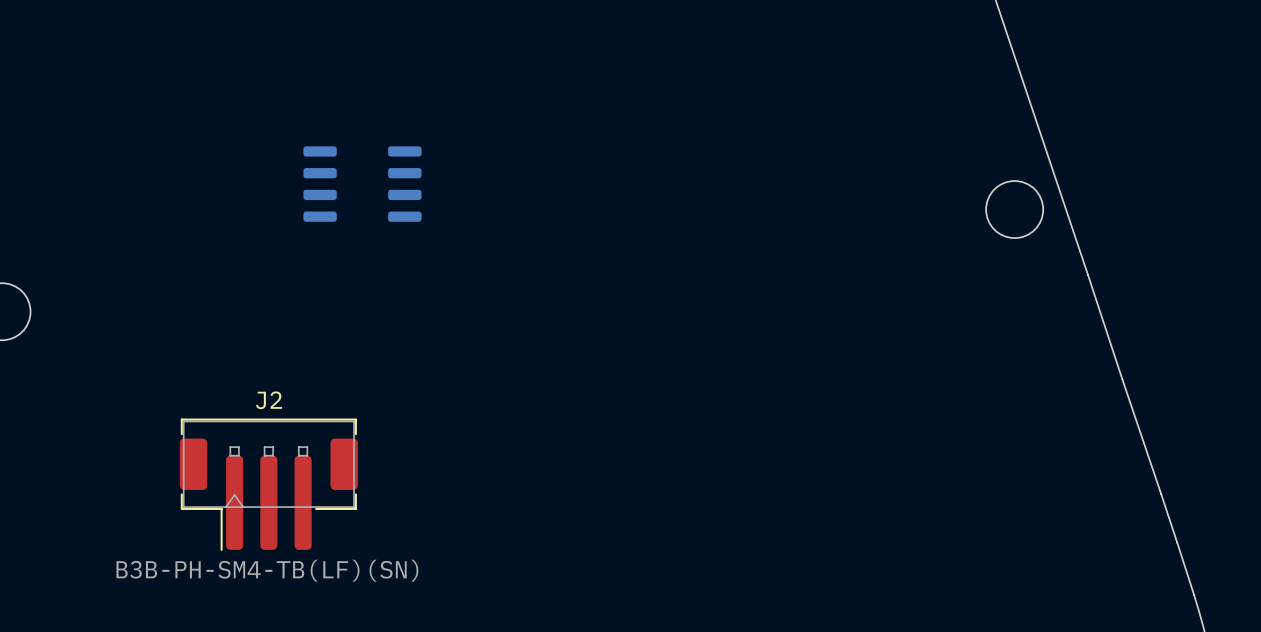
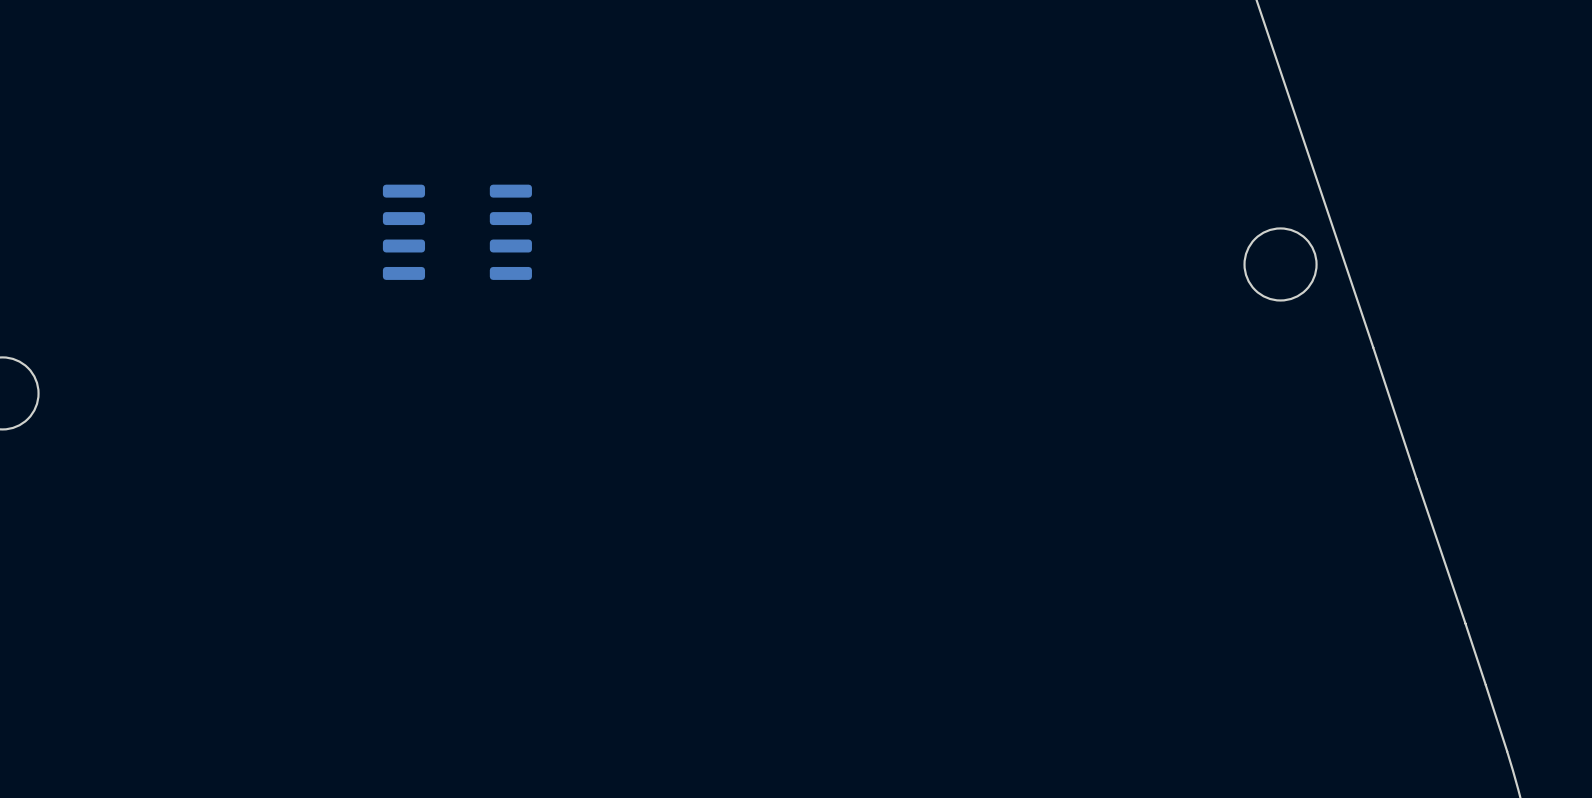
J2: B3B-PH-SM4-TB(LF)(SN) (268, 484) -> none

